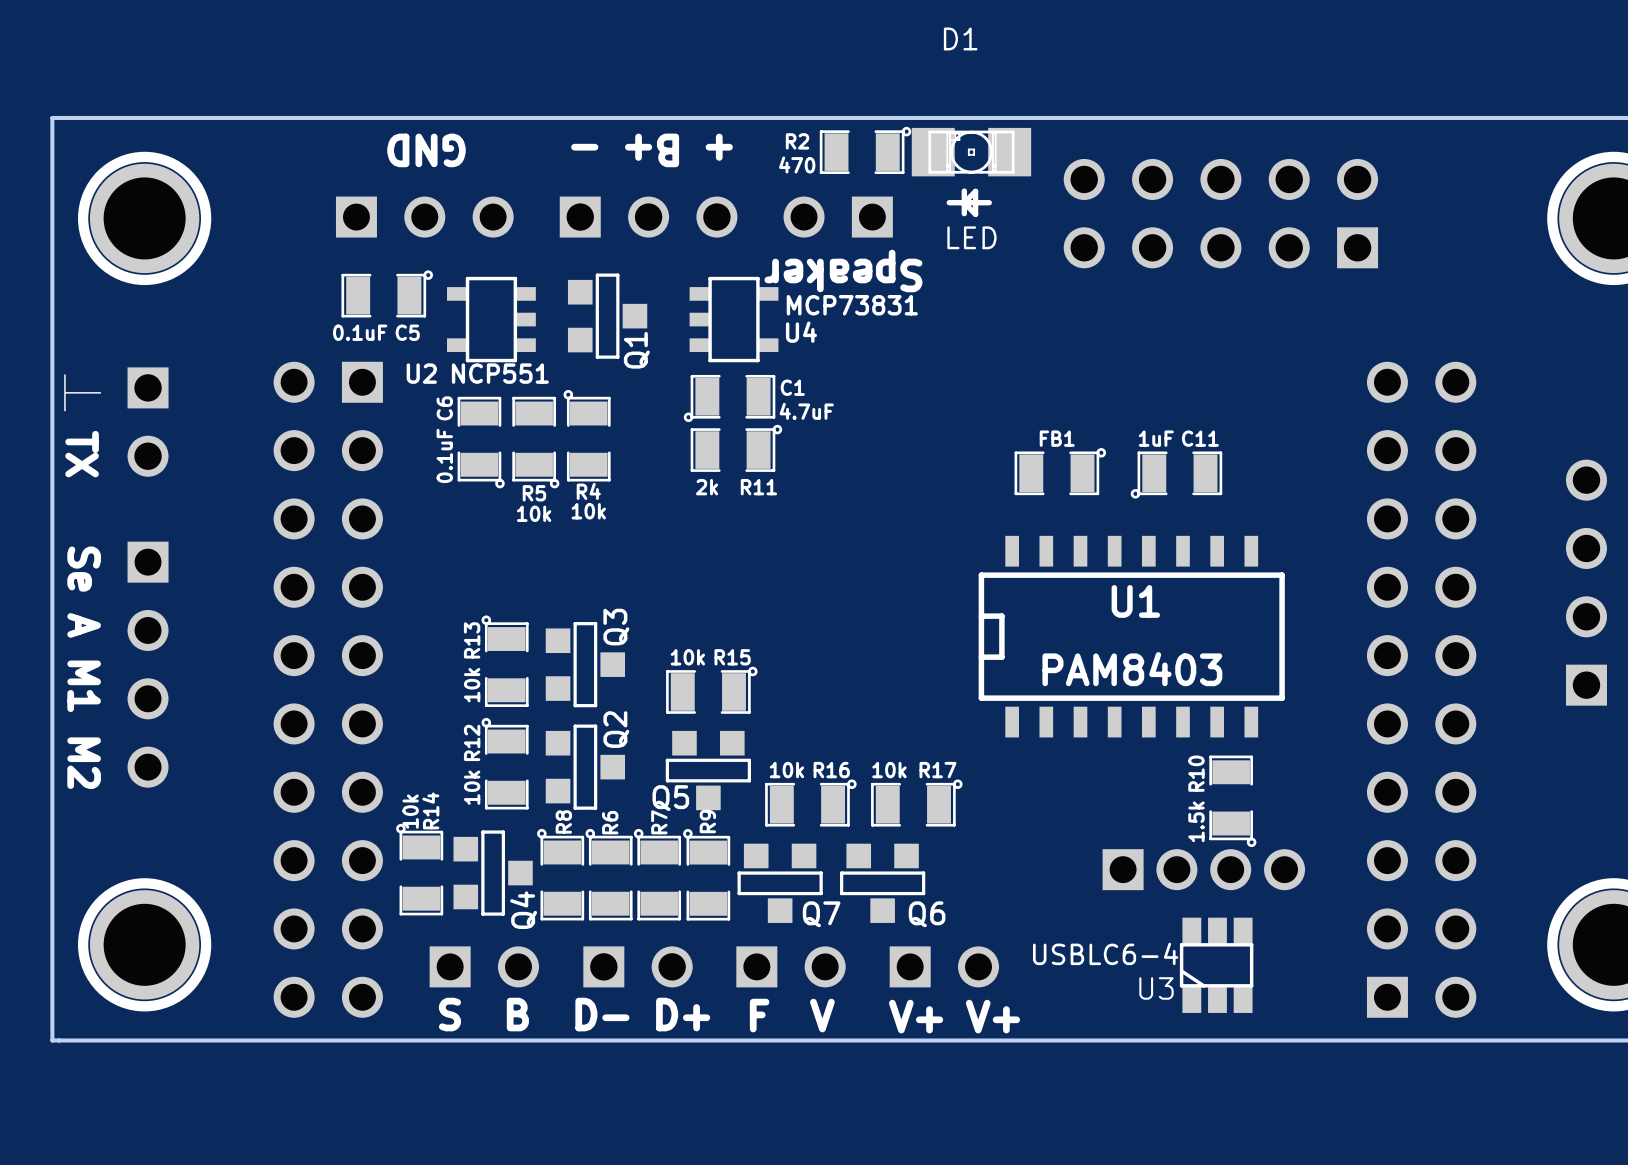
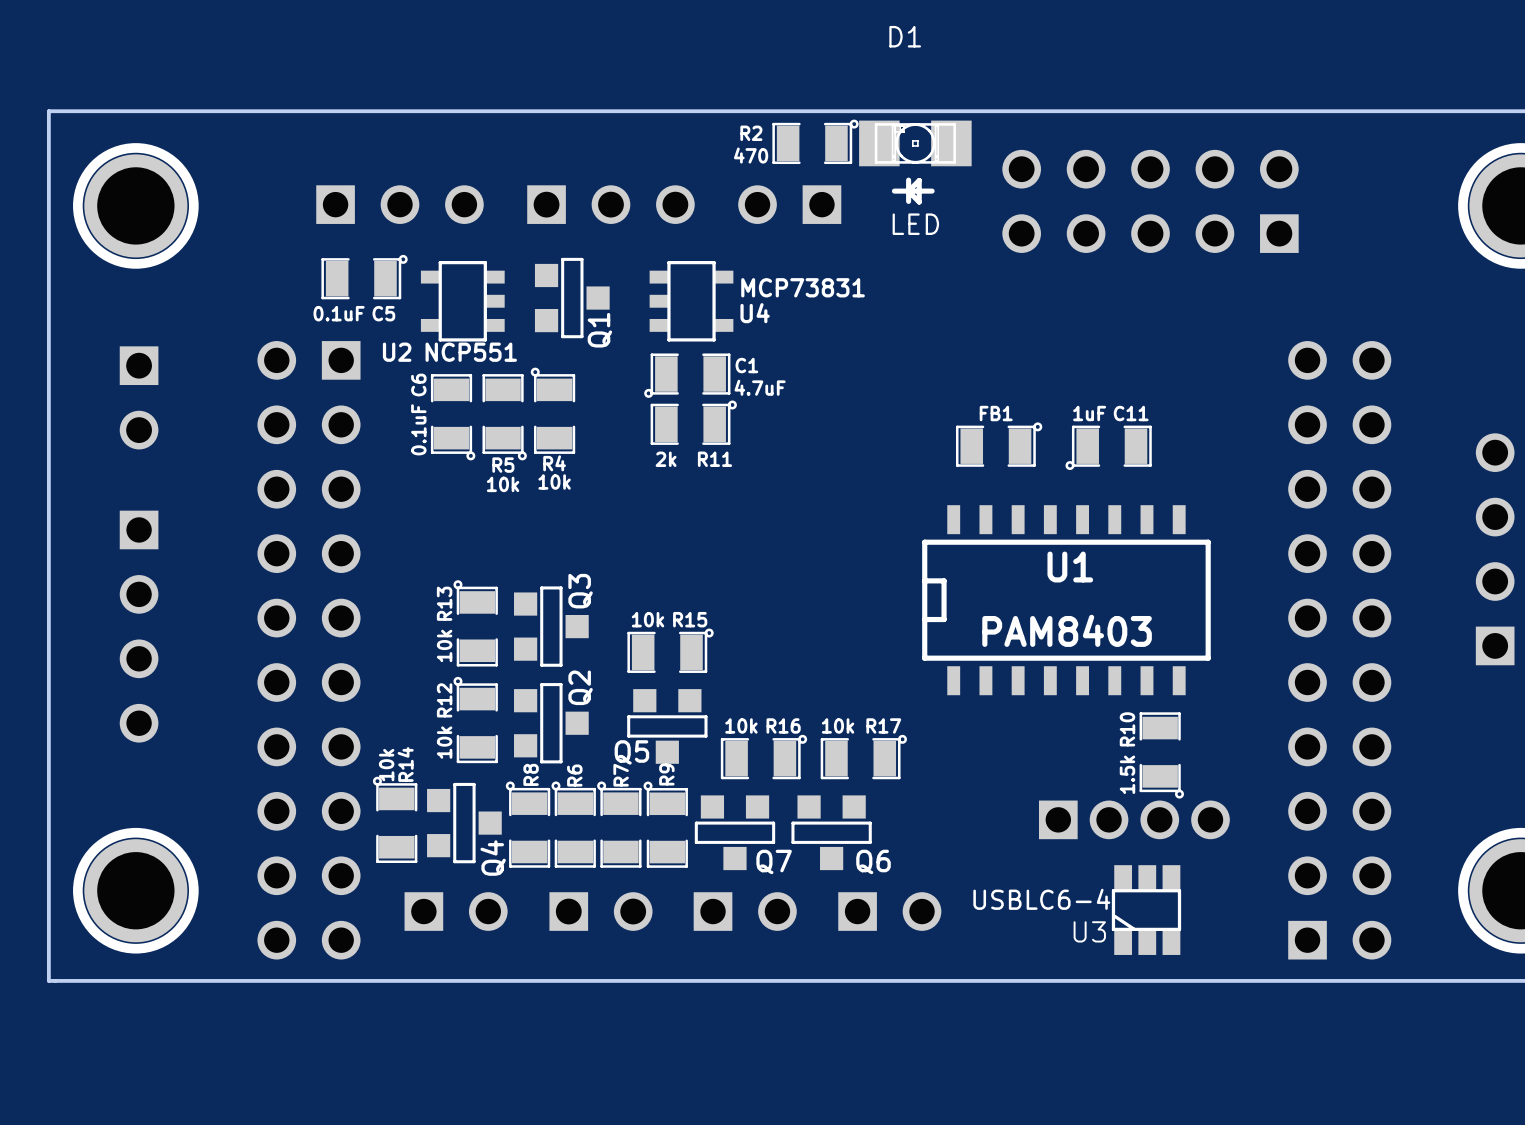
text: GND (426, 150) -> none
text: + B+ - (652, 150) -> none
text: Speaker (843, 270) -> none
text: ⏊ TX (82, 424) -> none
text: Se A M1 M2 (84, 667) -> none
text: S B (483, 1014) -> none
text: D- D+ (642, 1014) -> none
text: F V (792, 1015) -> none
text: V+ V+ (954, 1016) -> none

